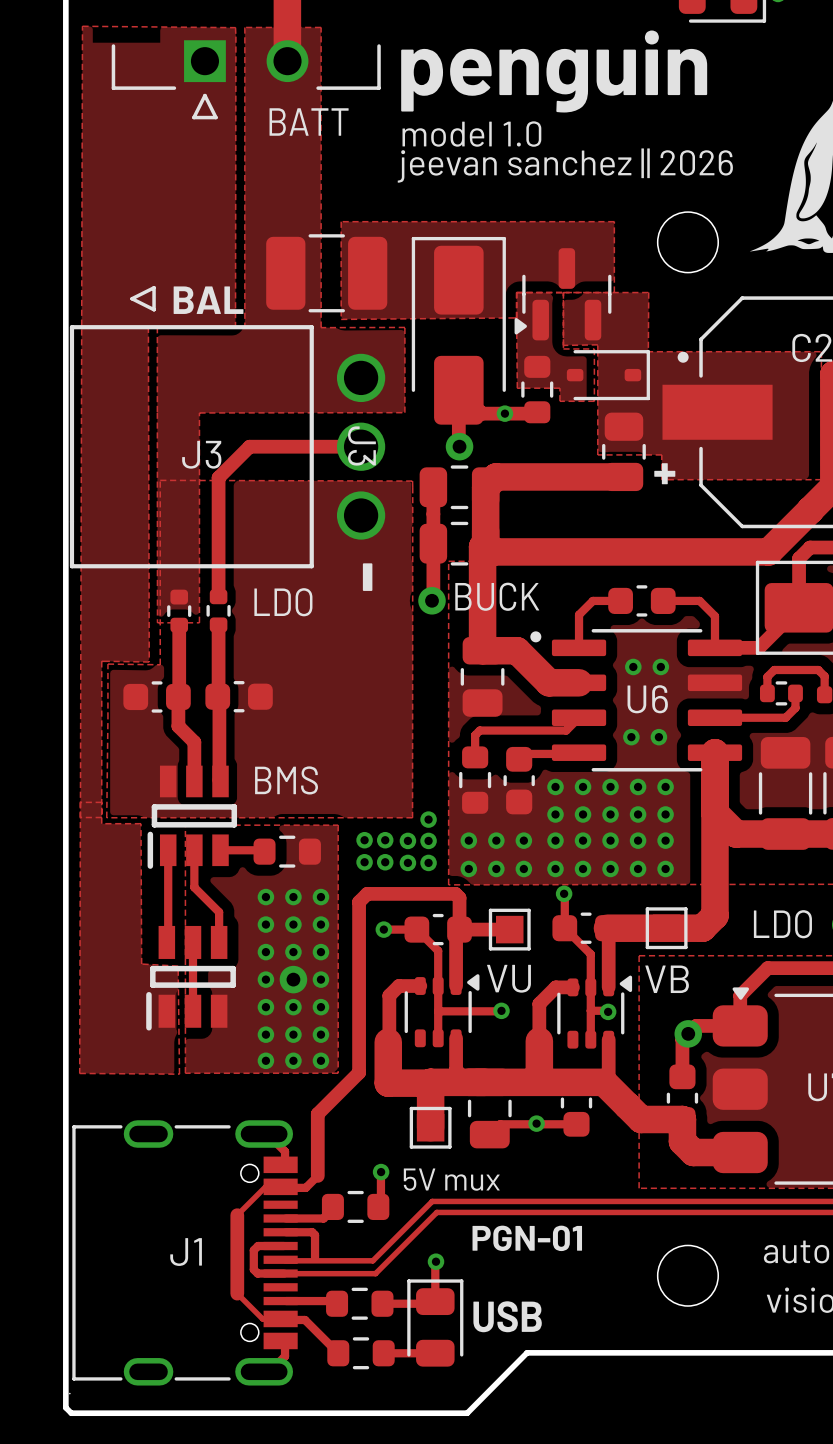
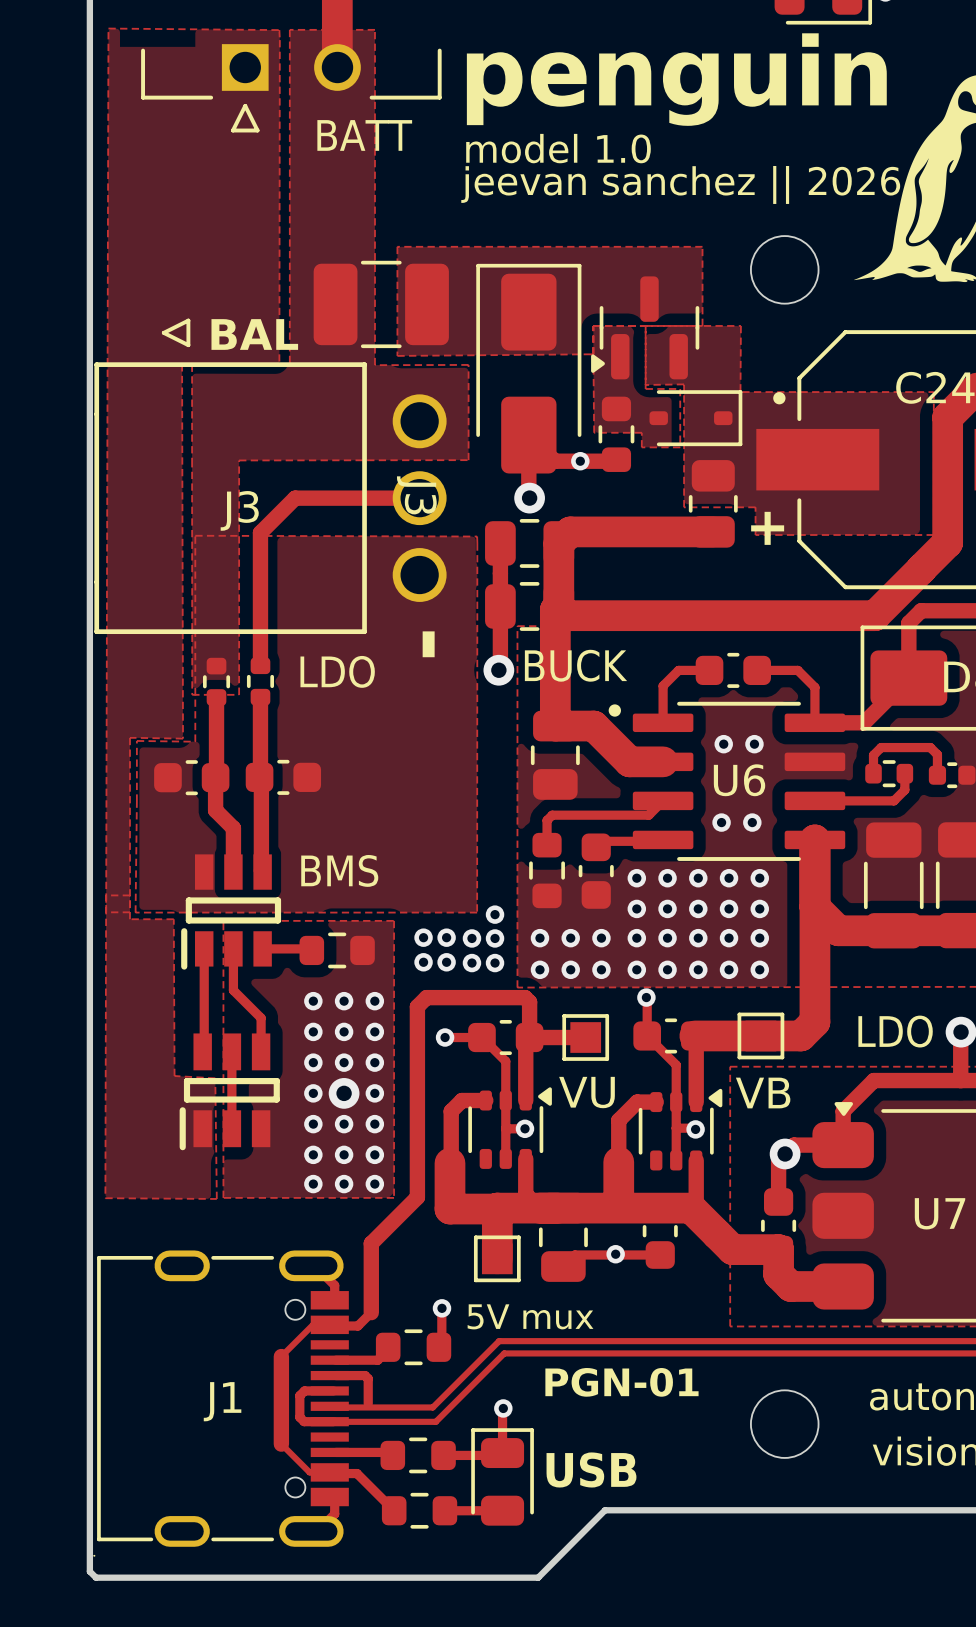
track: (501, 1010) (455, 1011) -> none
via position: (501, 1010) -> (524, 1128)

